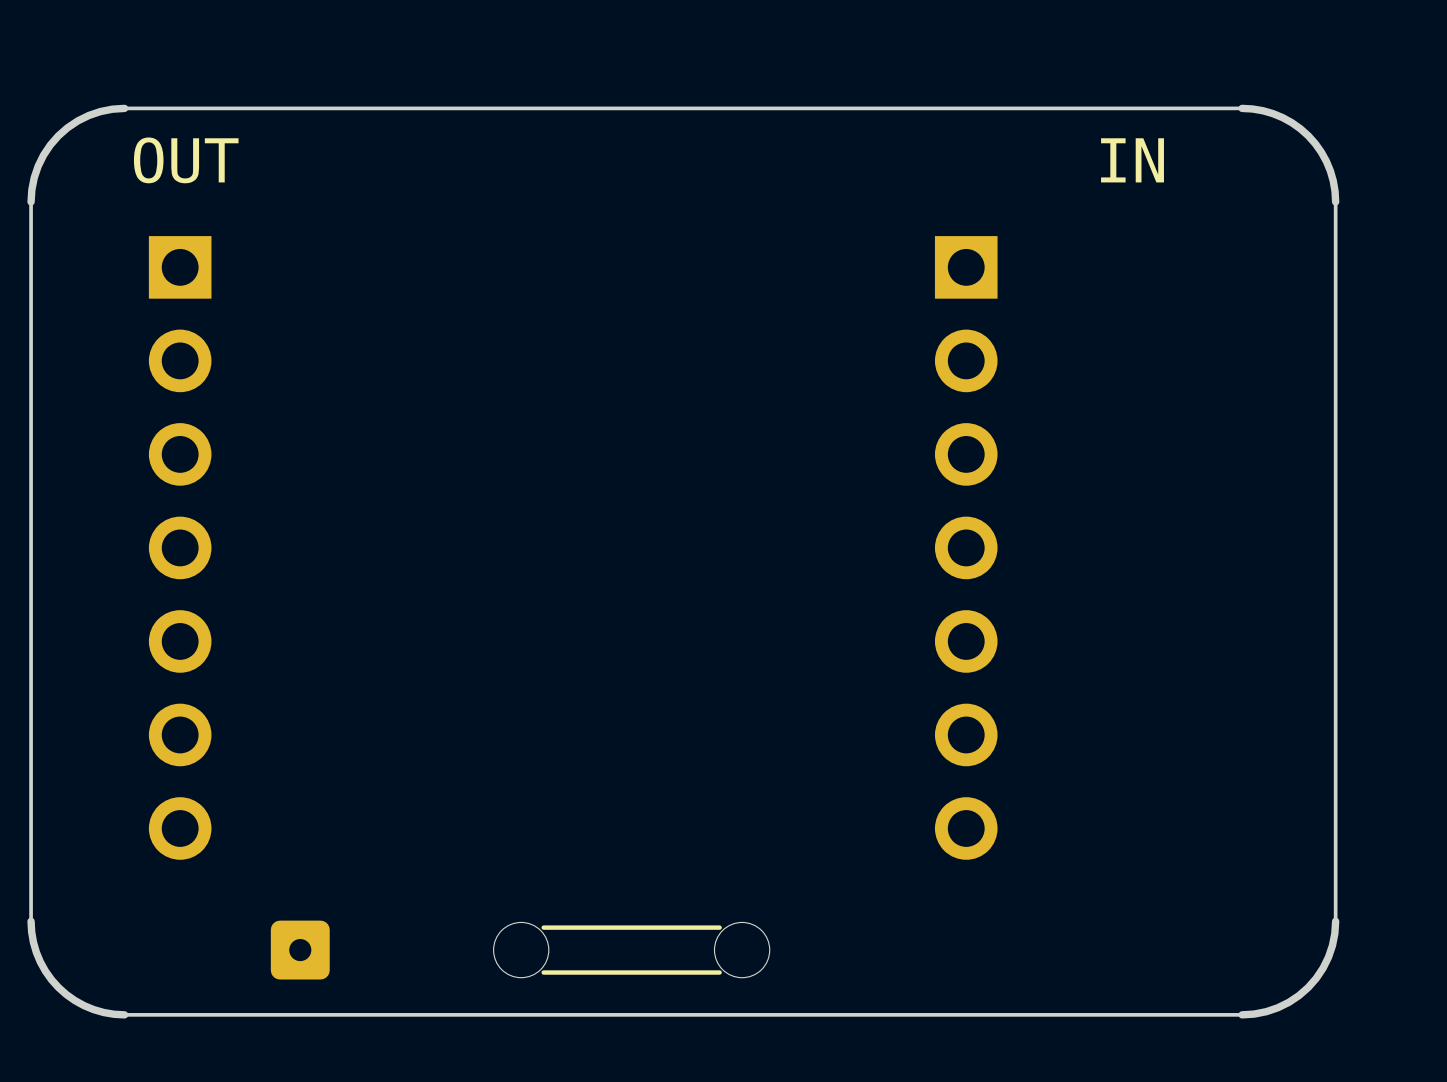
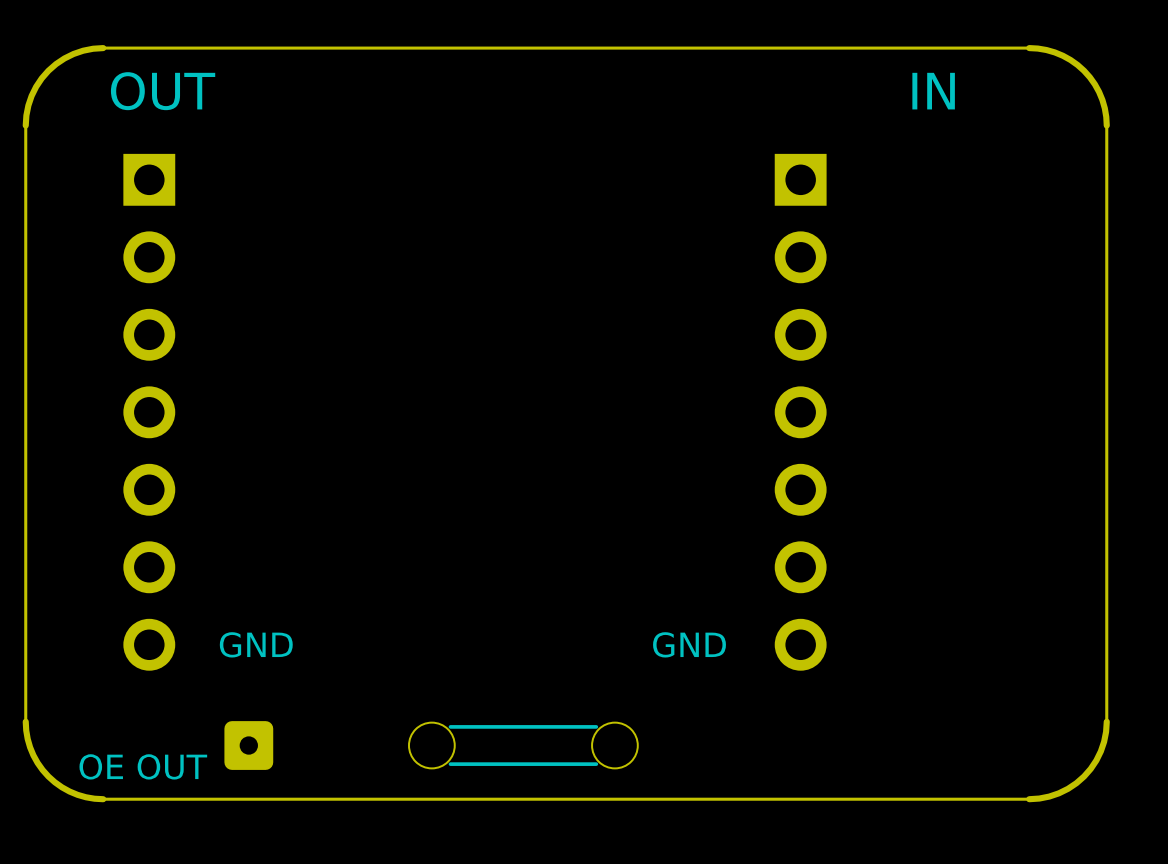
text: none -> GND (256, 644)
text: none -> GND (689, 644)
text: none -> OE OUT (143, 766)

